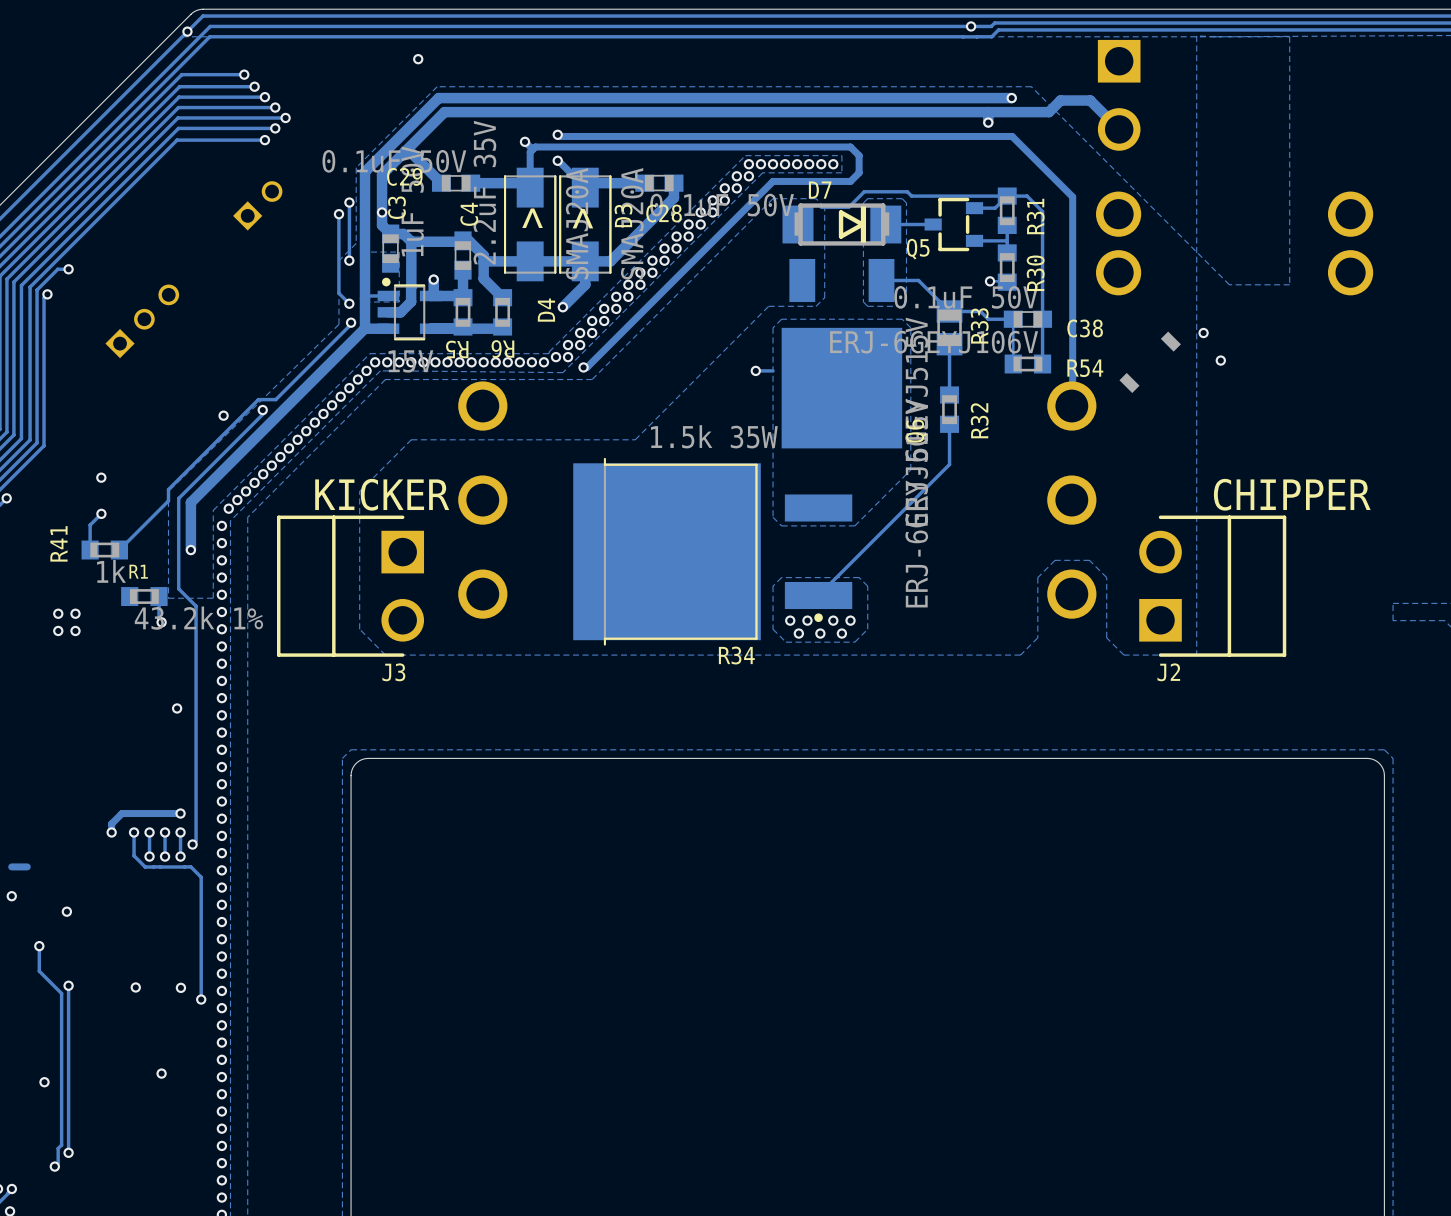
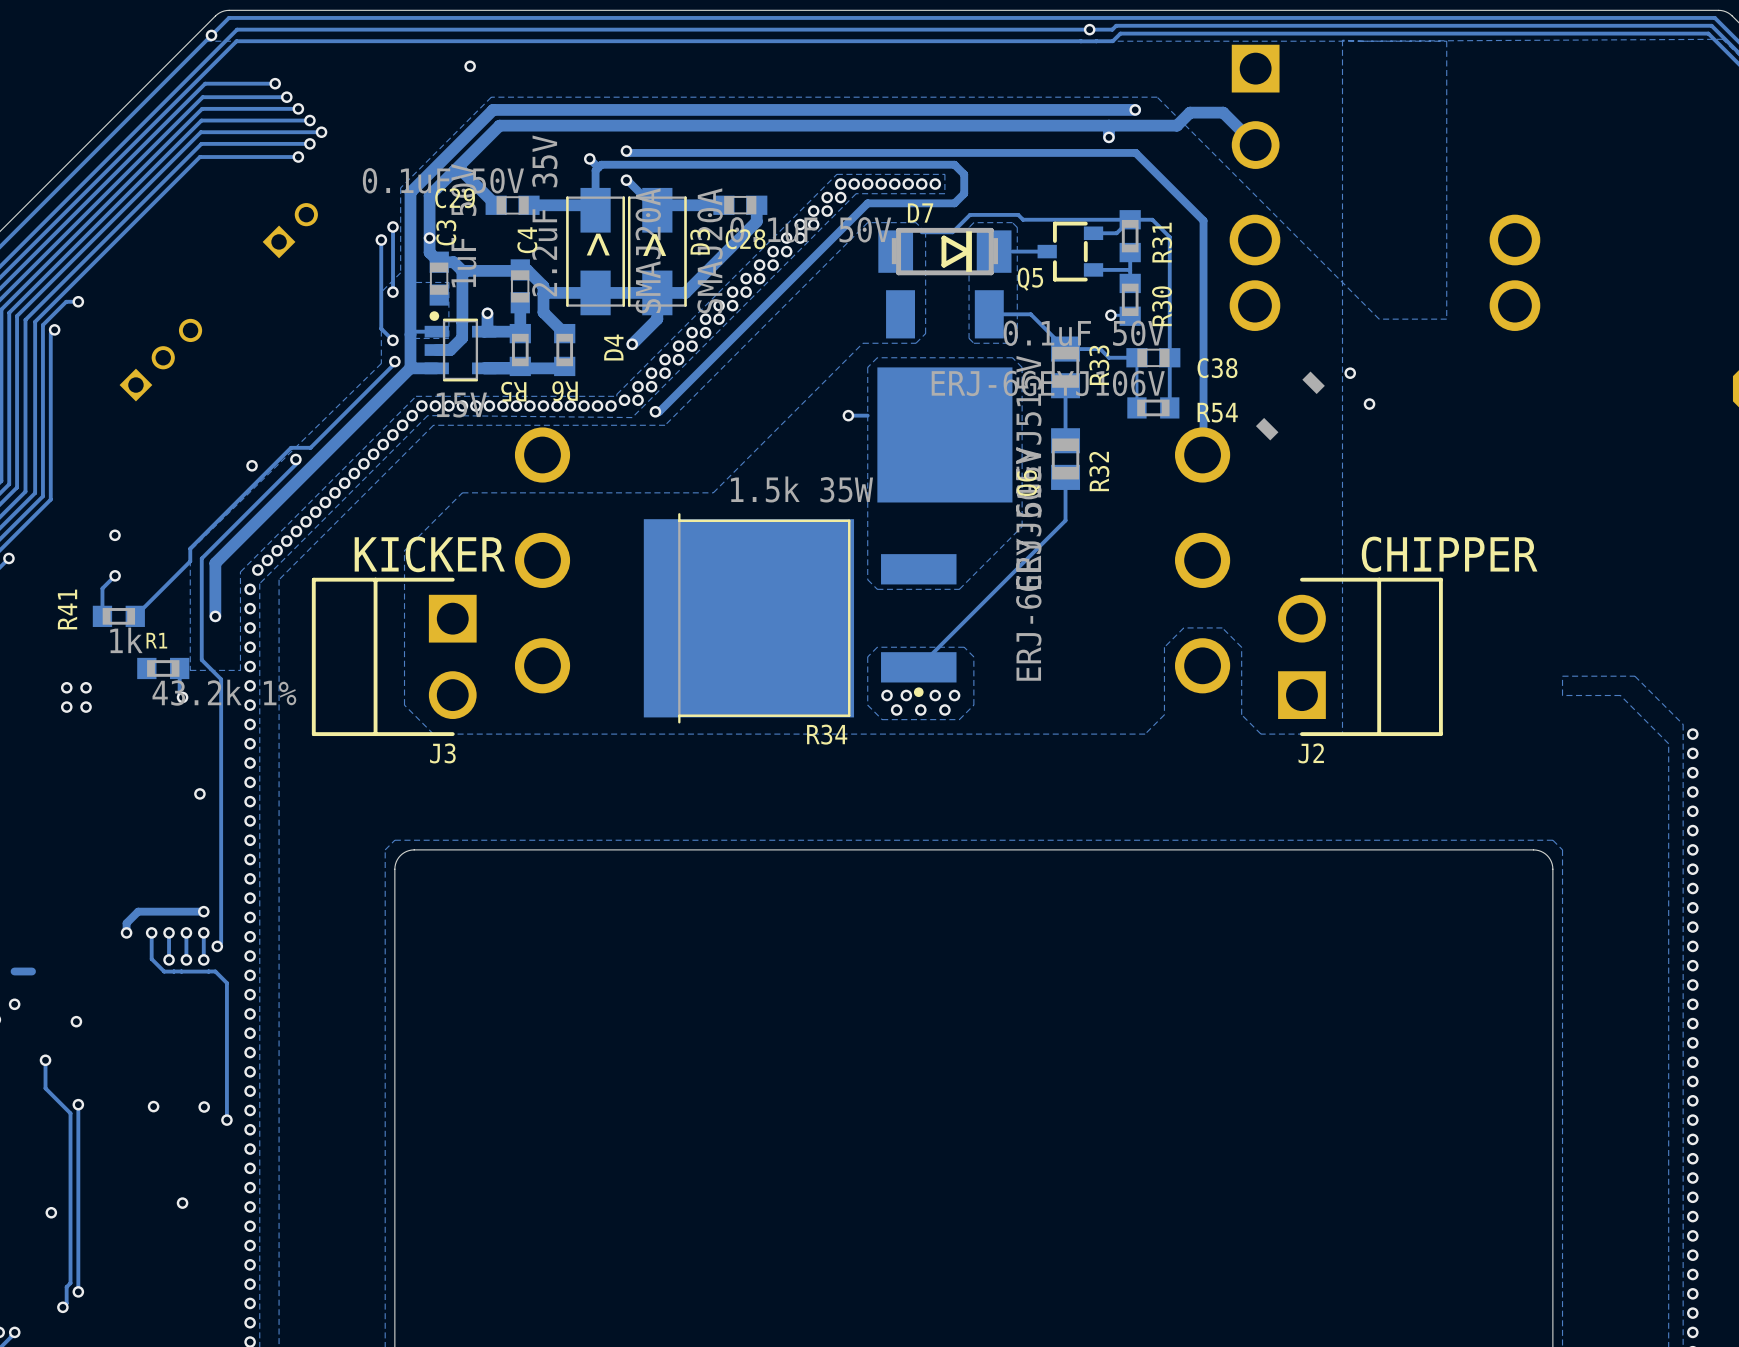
R32 footprint: [940, 386, 960, 433] -> [1051, 428, 1081, 490]

